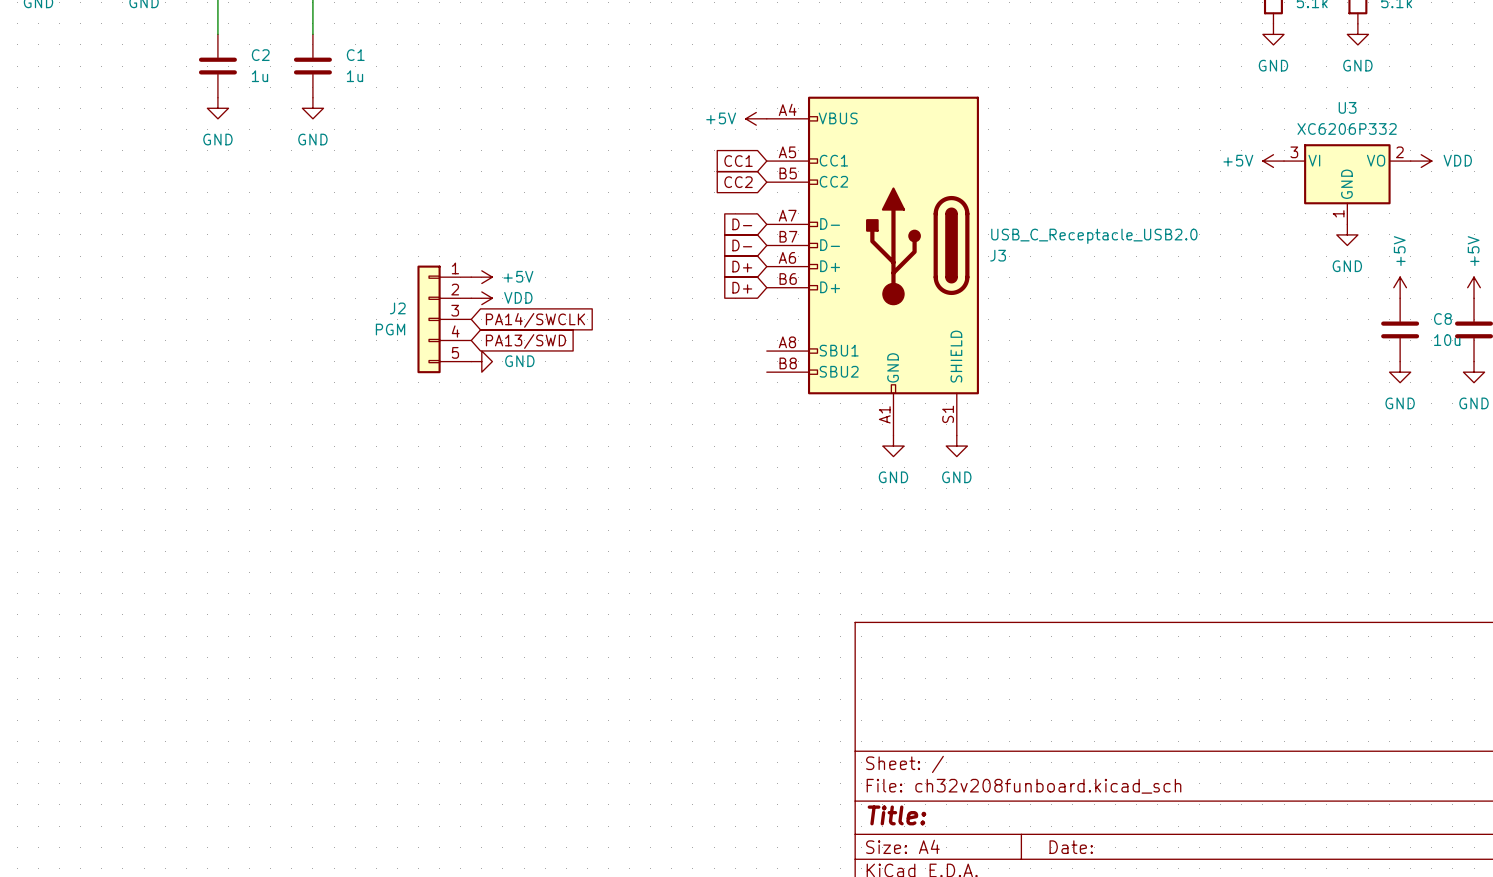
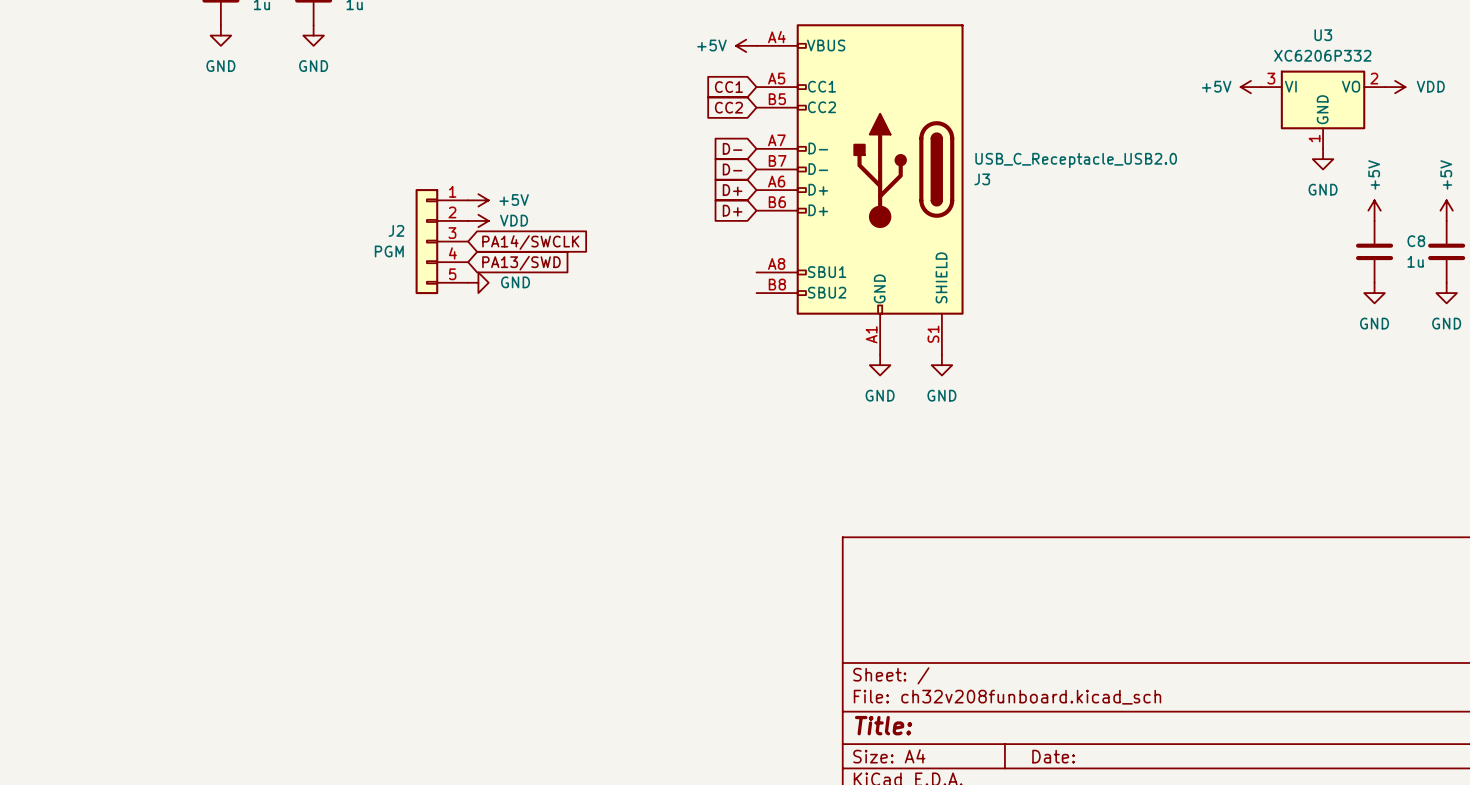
C8 value: 10u (1447, 340) -> 1u (1415, 261)

